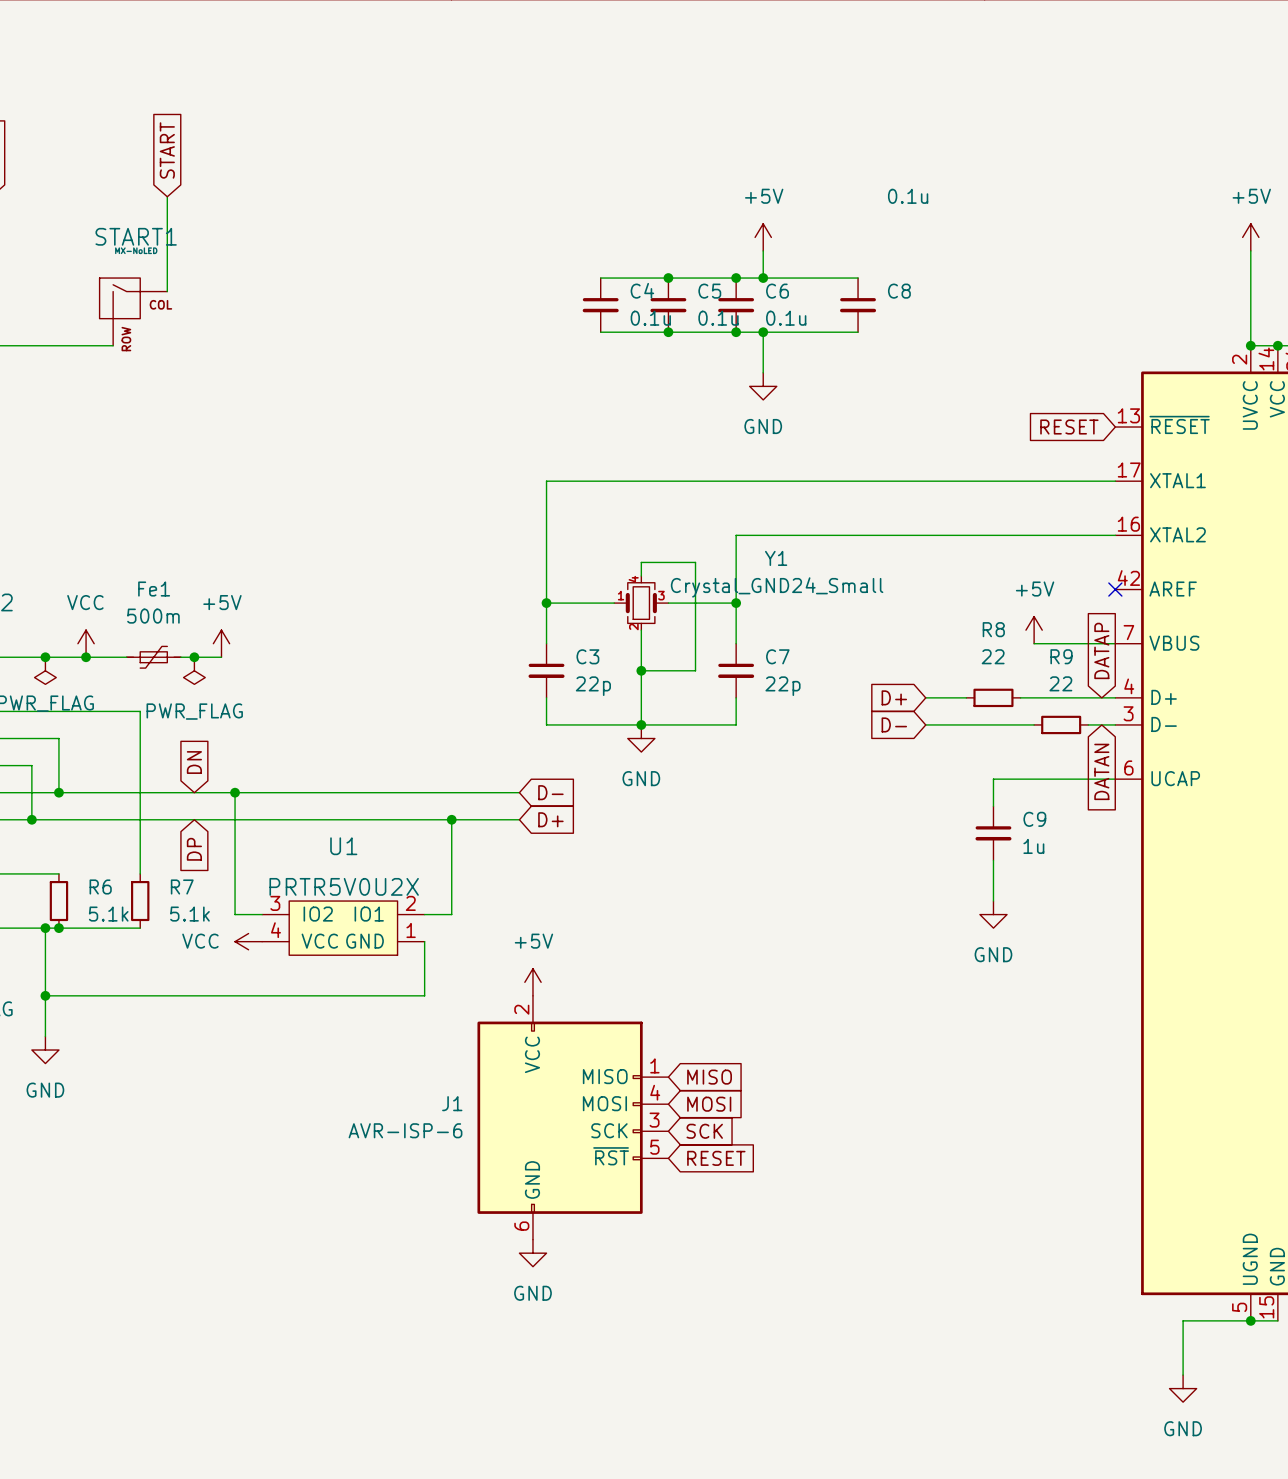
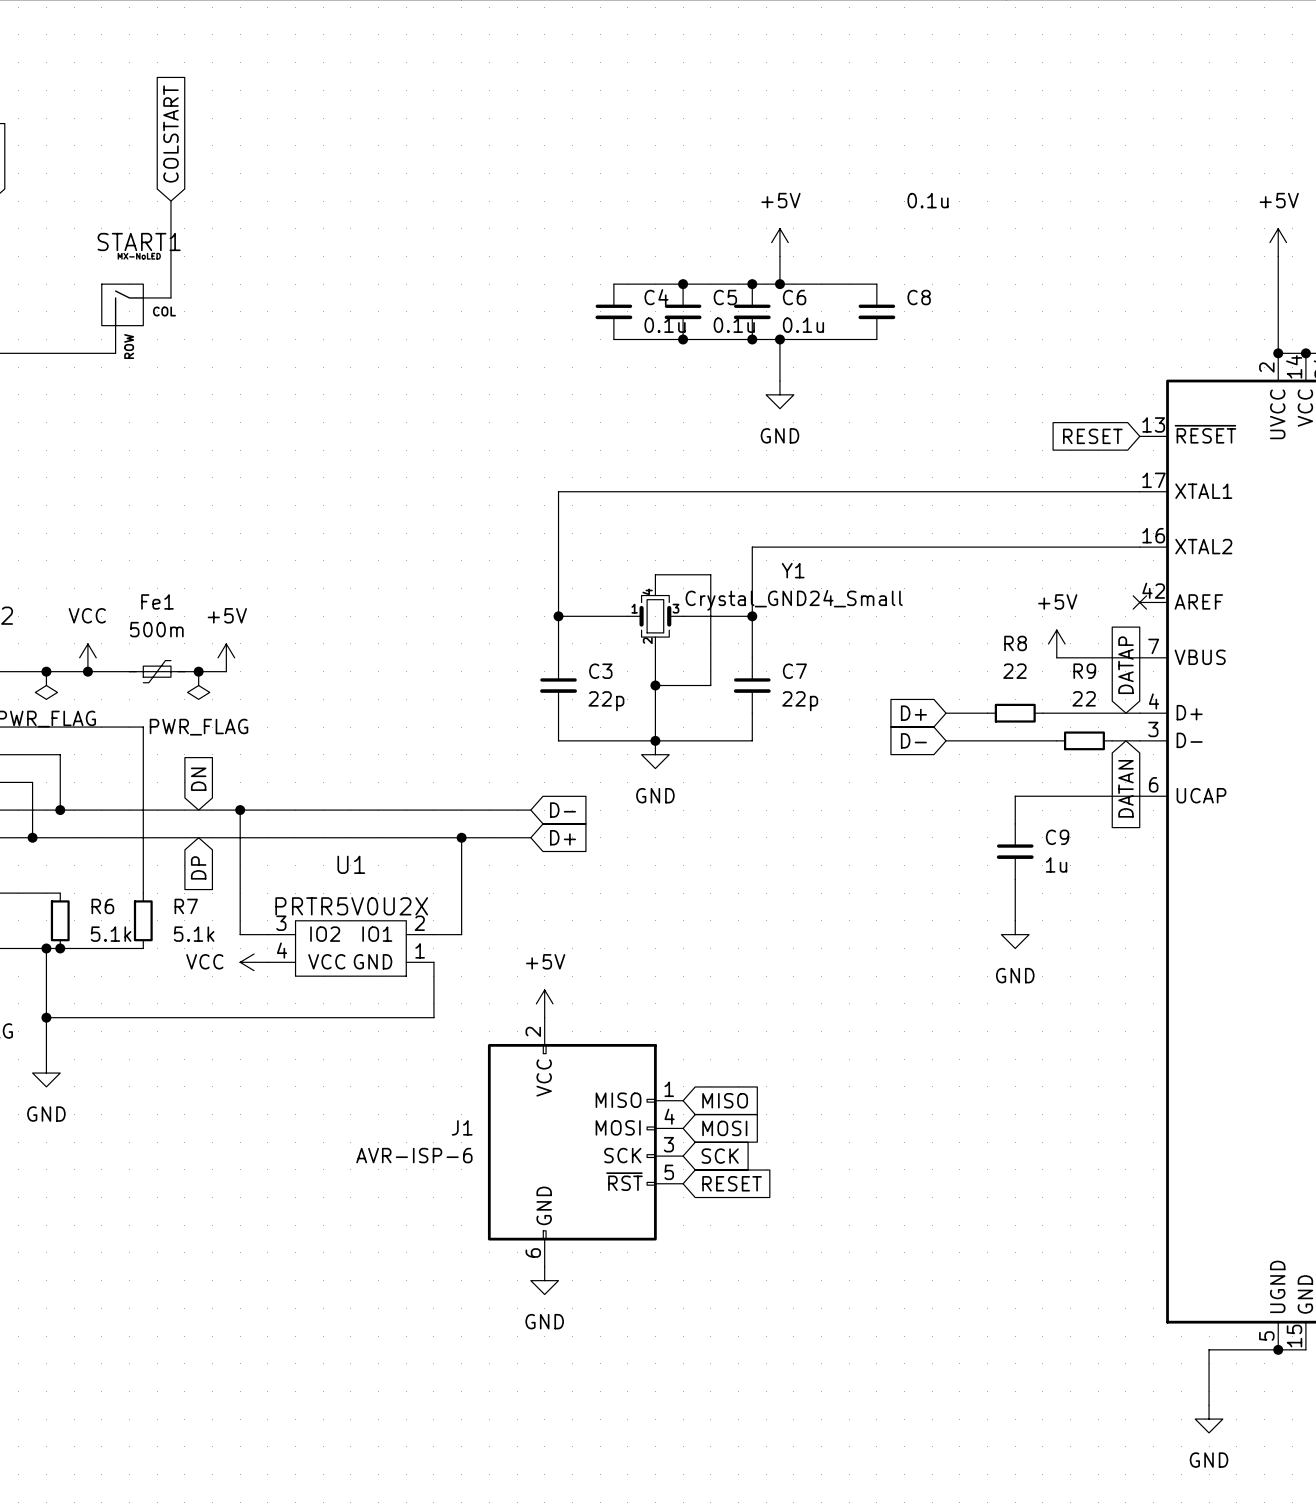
global label: START (167, 150) -> COLSTART (170, 134)

